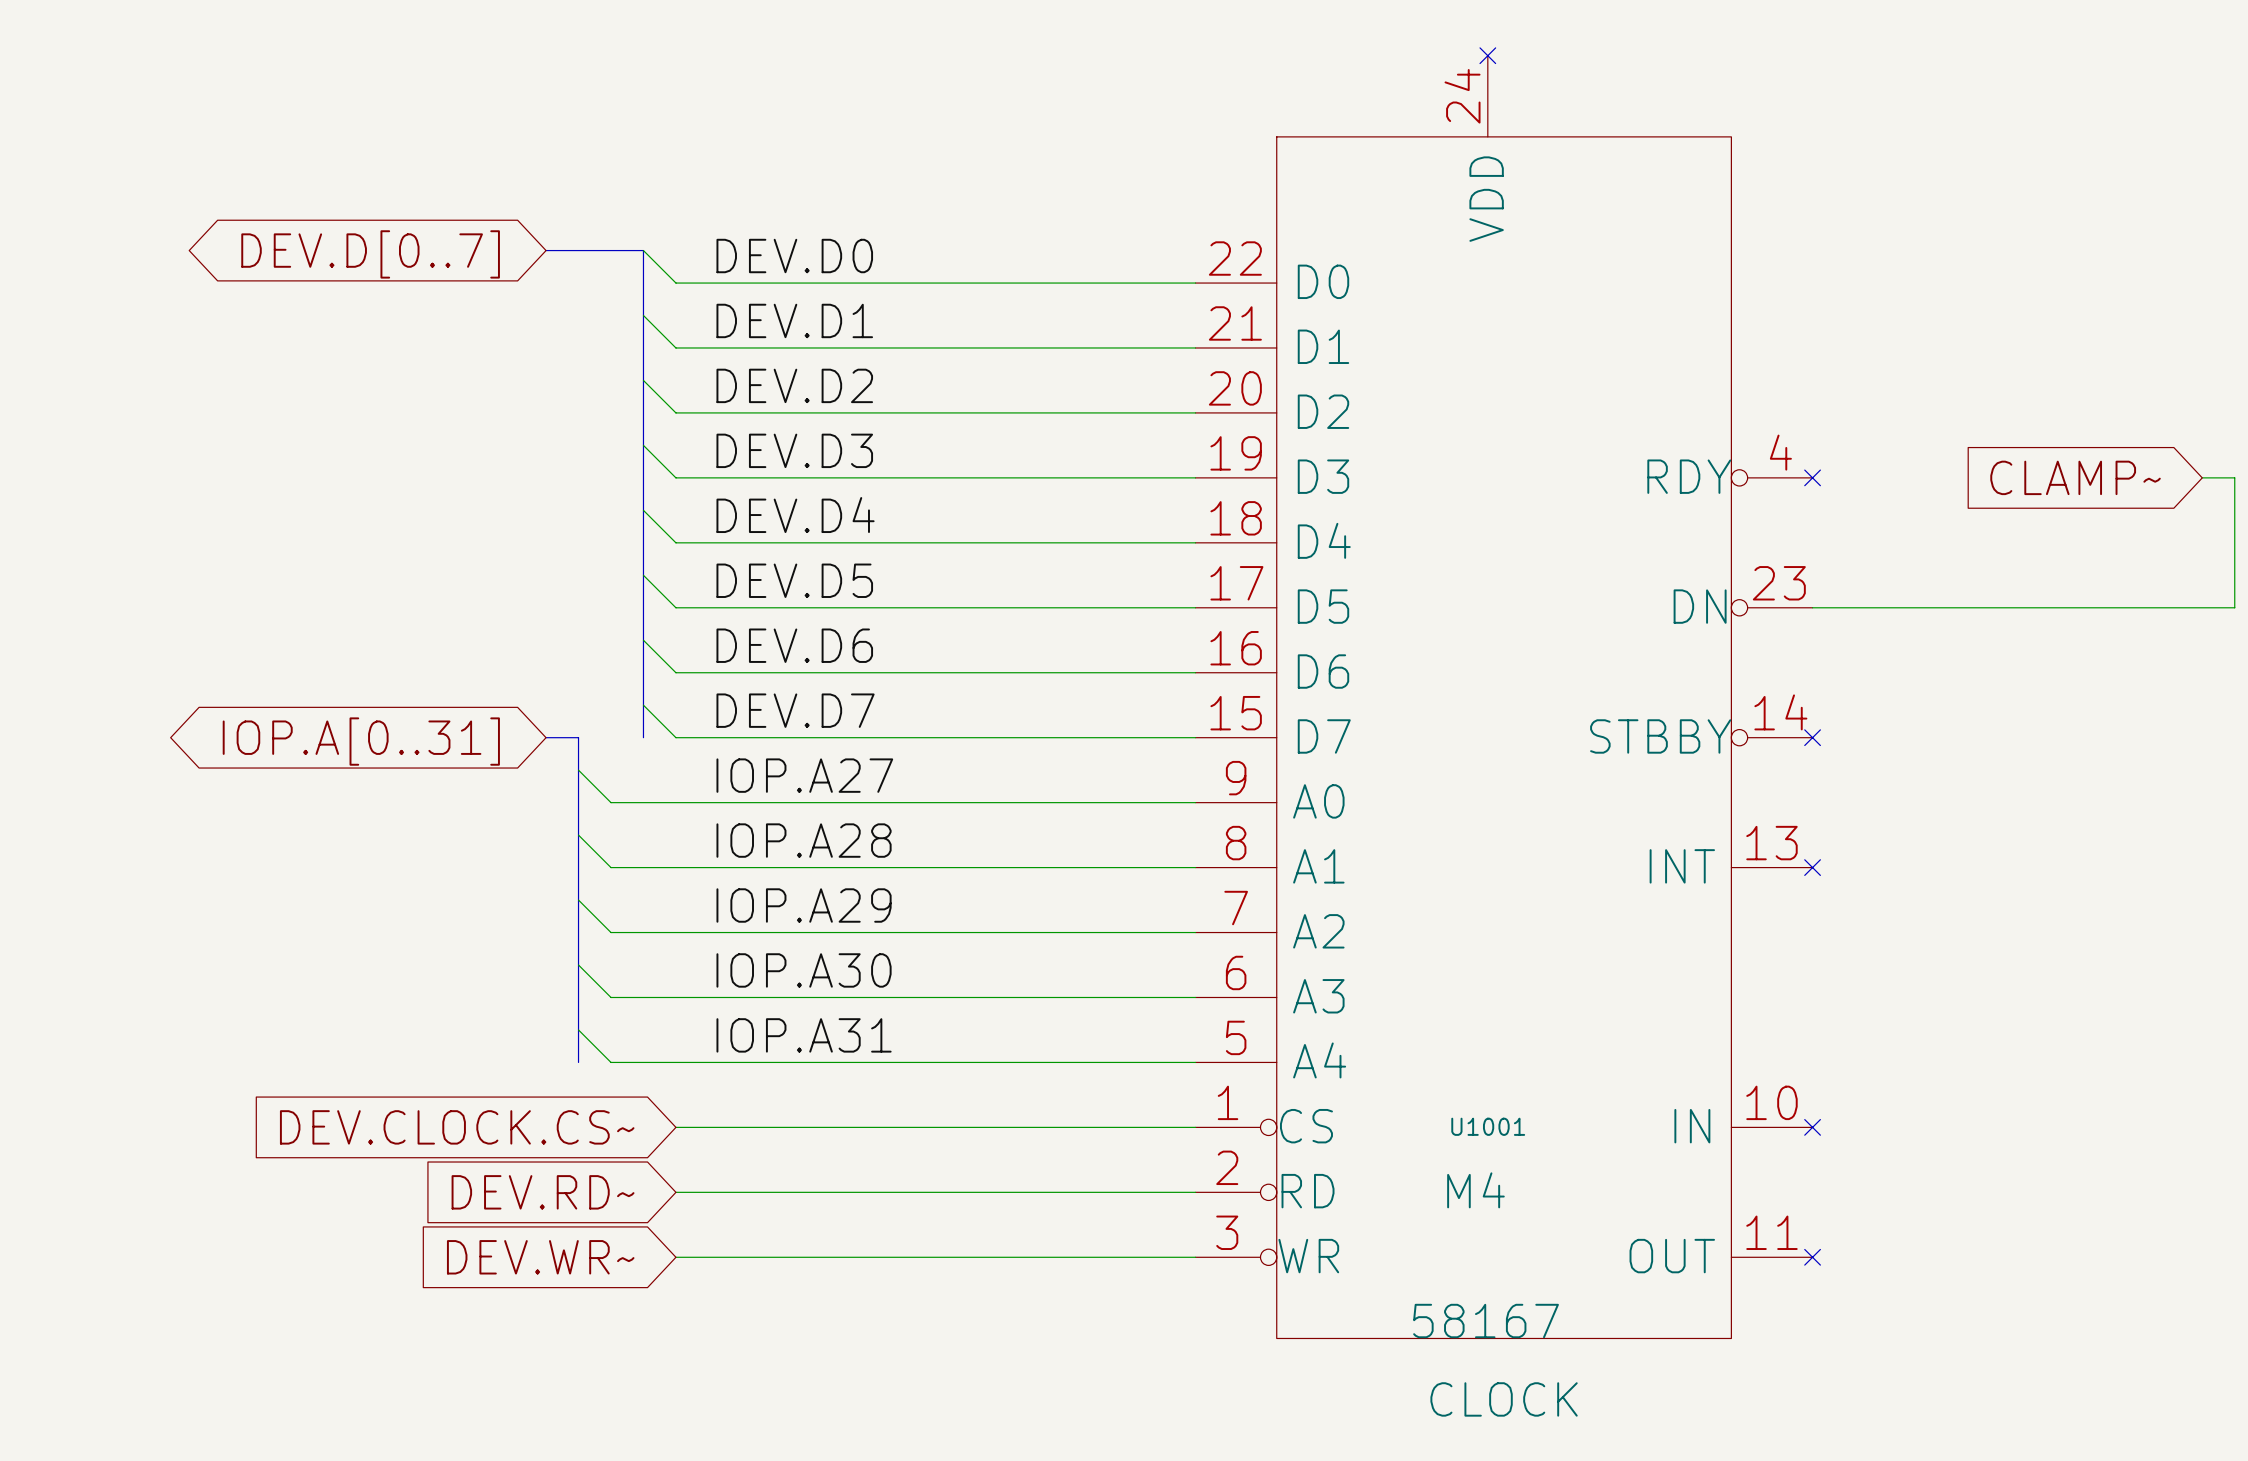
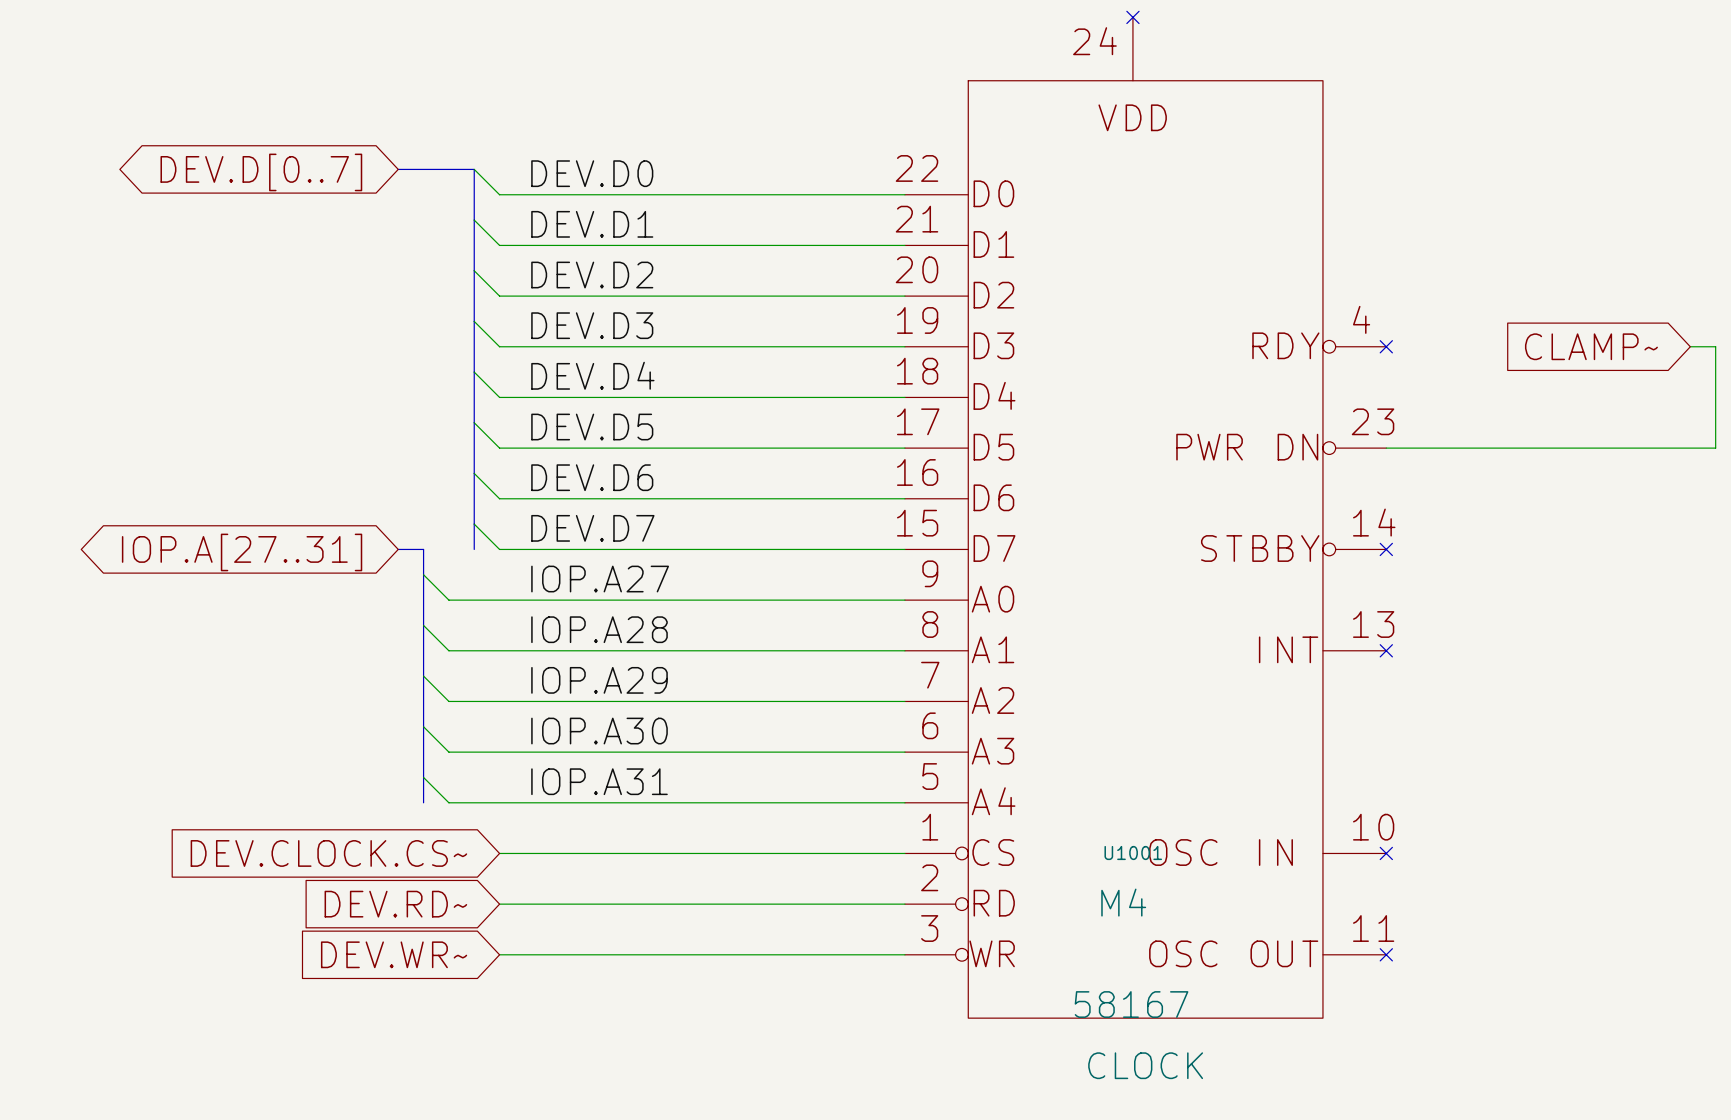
U1001 symbol: [1195, 55, 1813, 1339] -> [904, 17, 1387, 1019]
global label: IOP.A[0..31] (361, 741) -> IOP.A[27..31] (242, 552)

